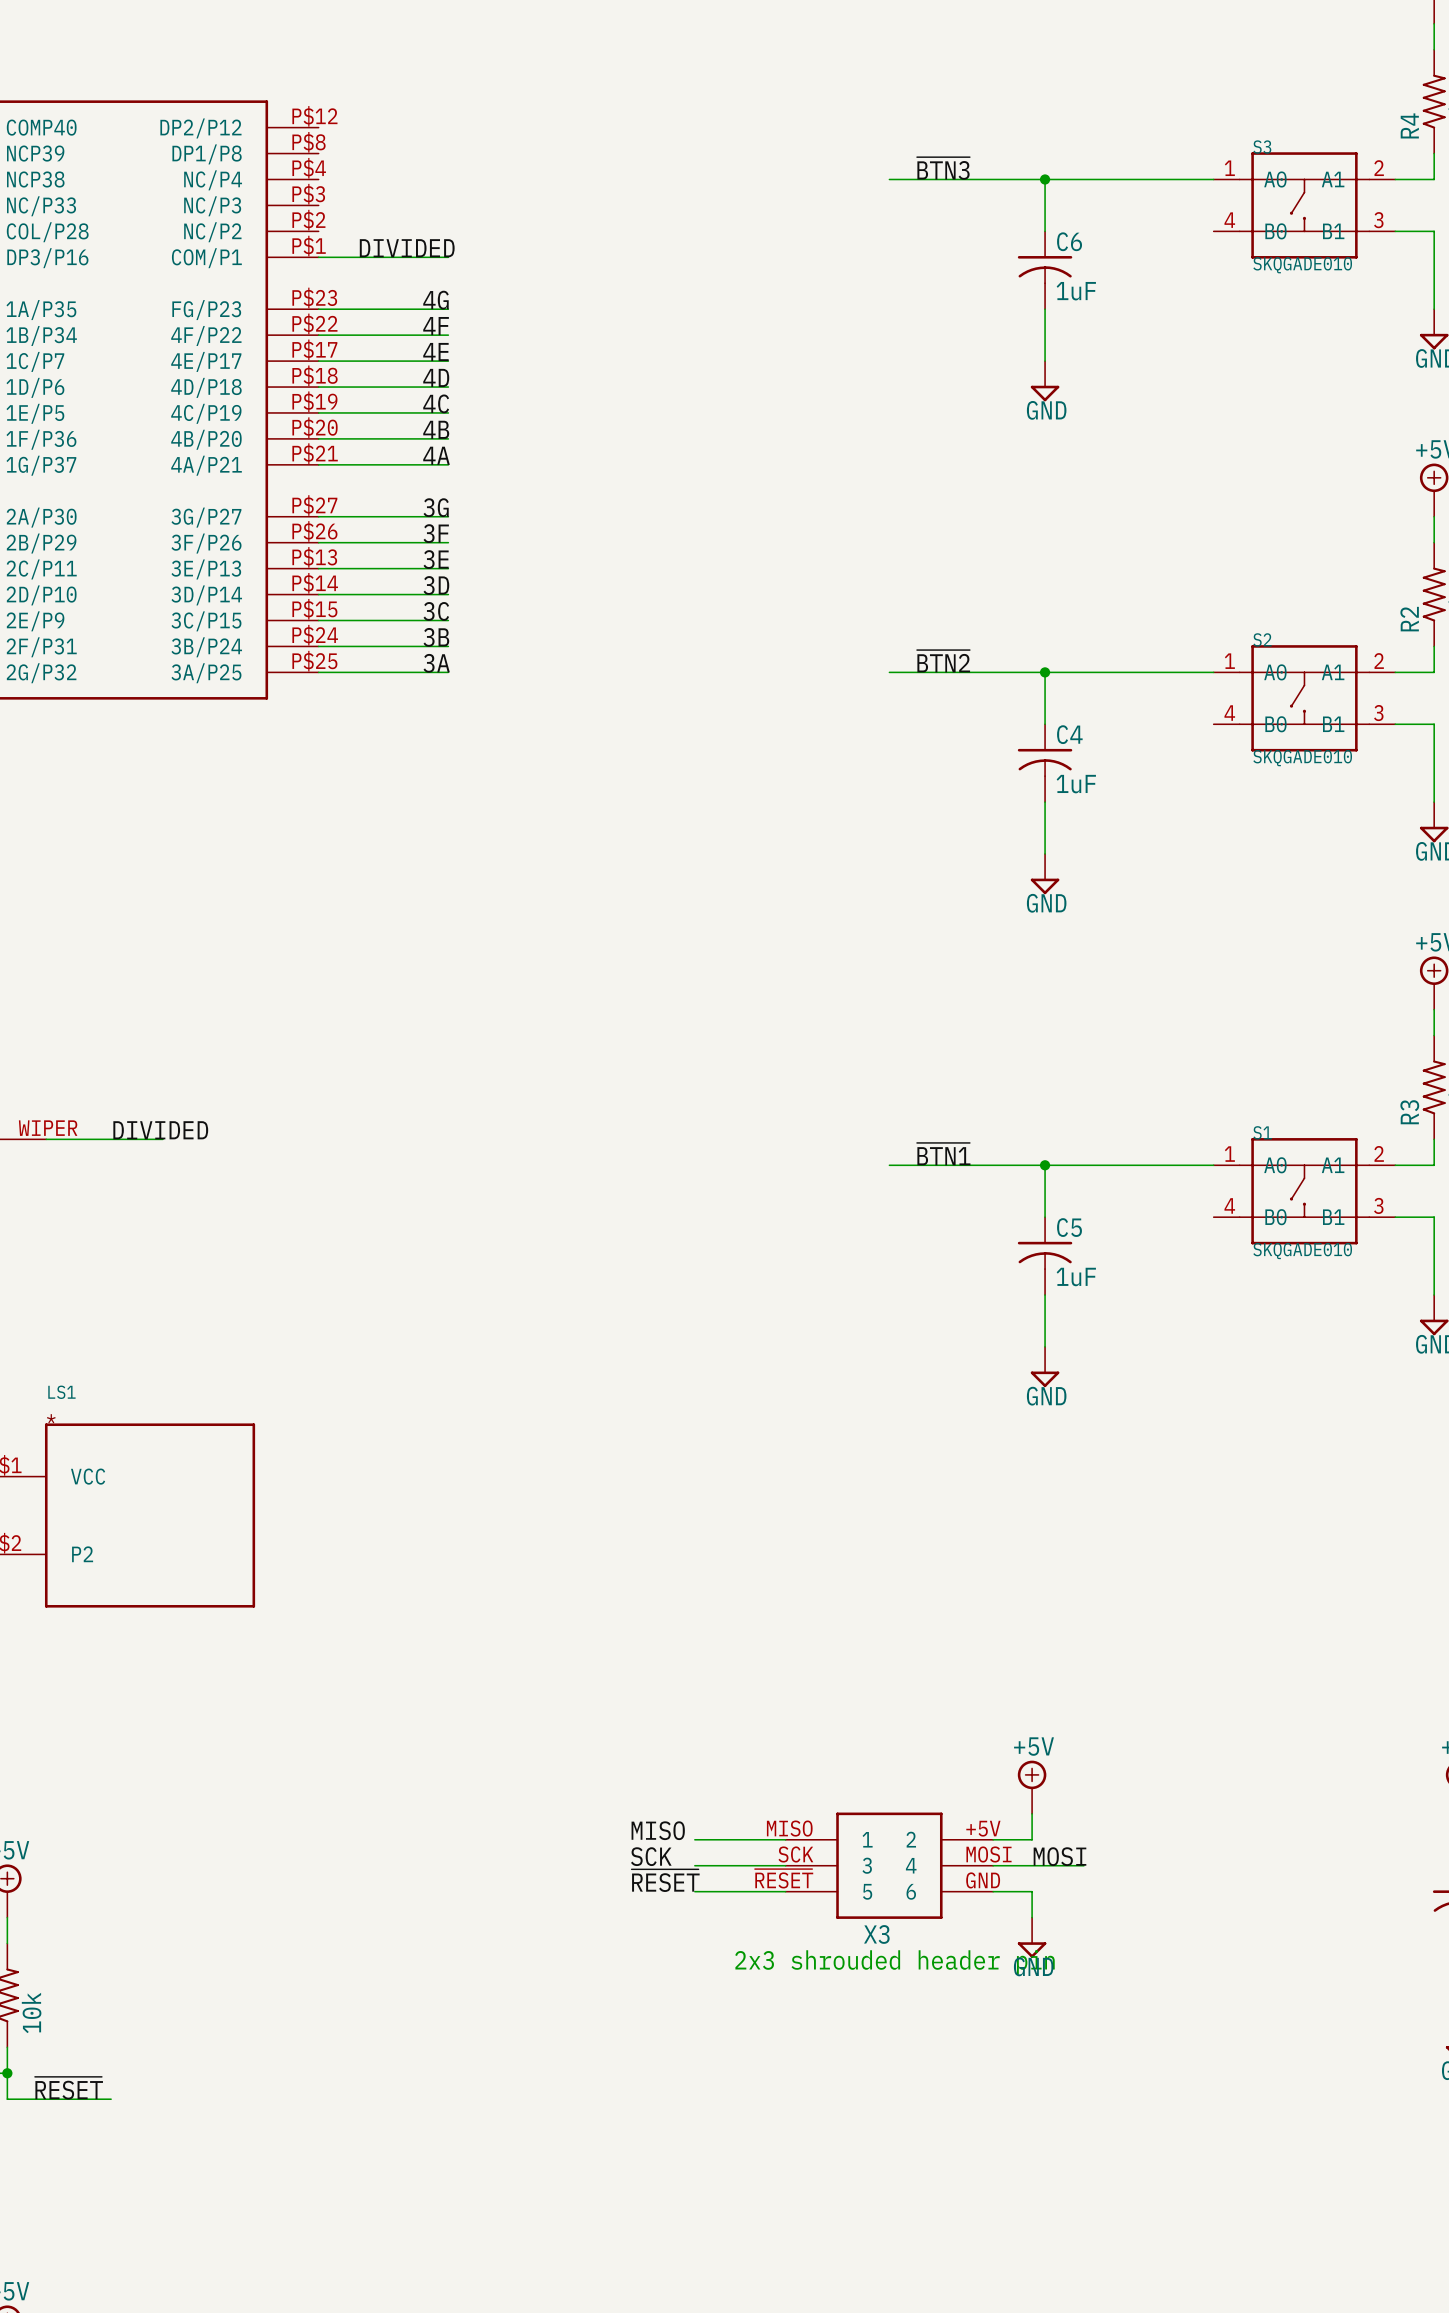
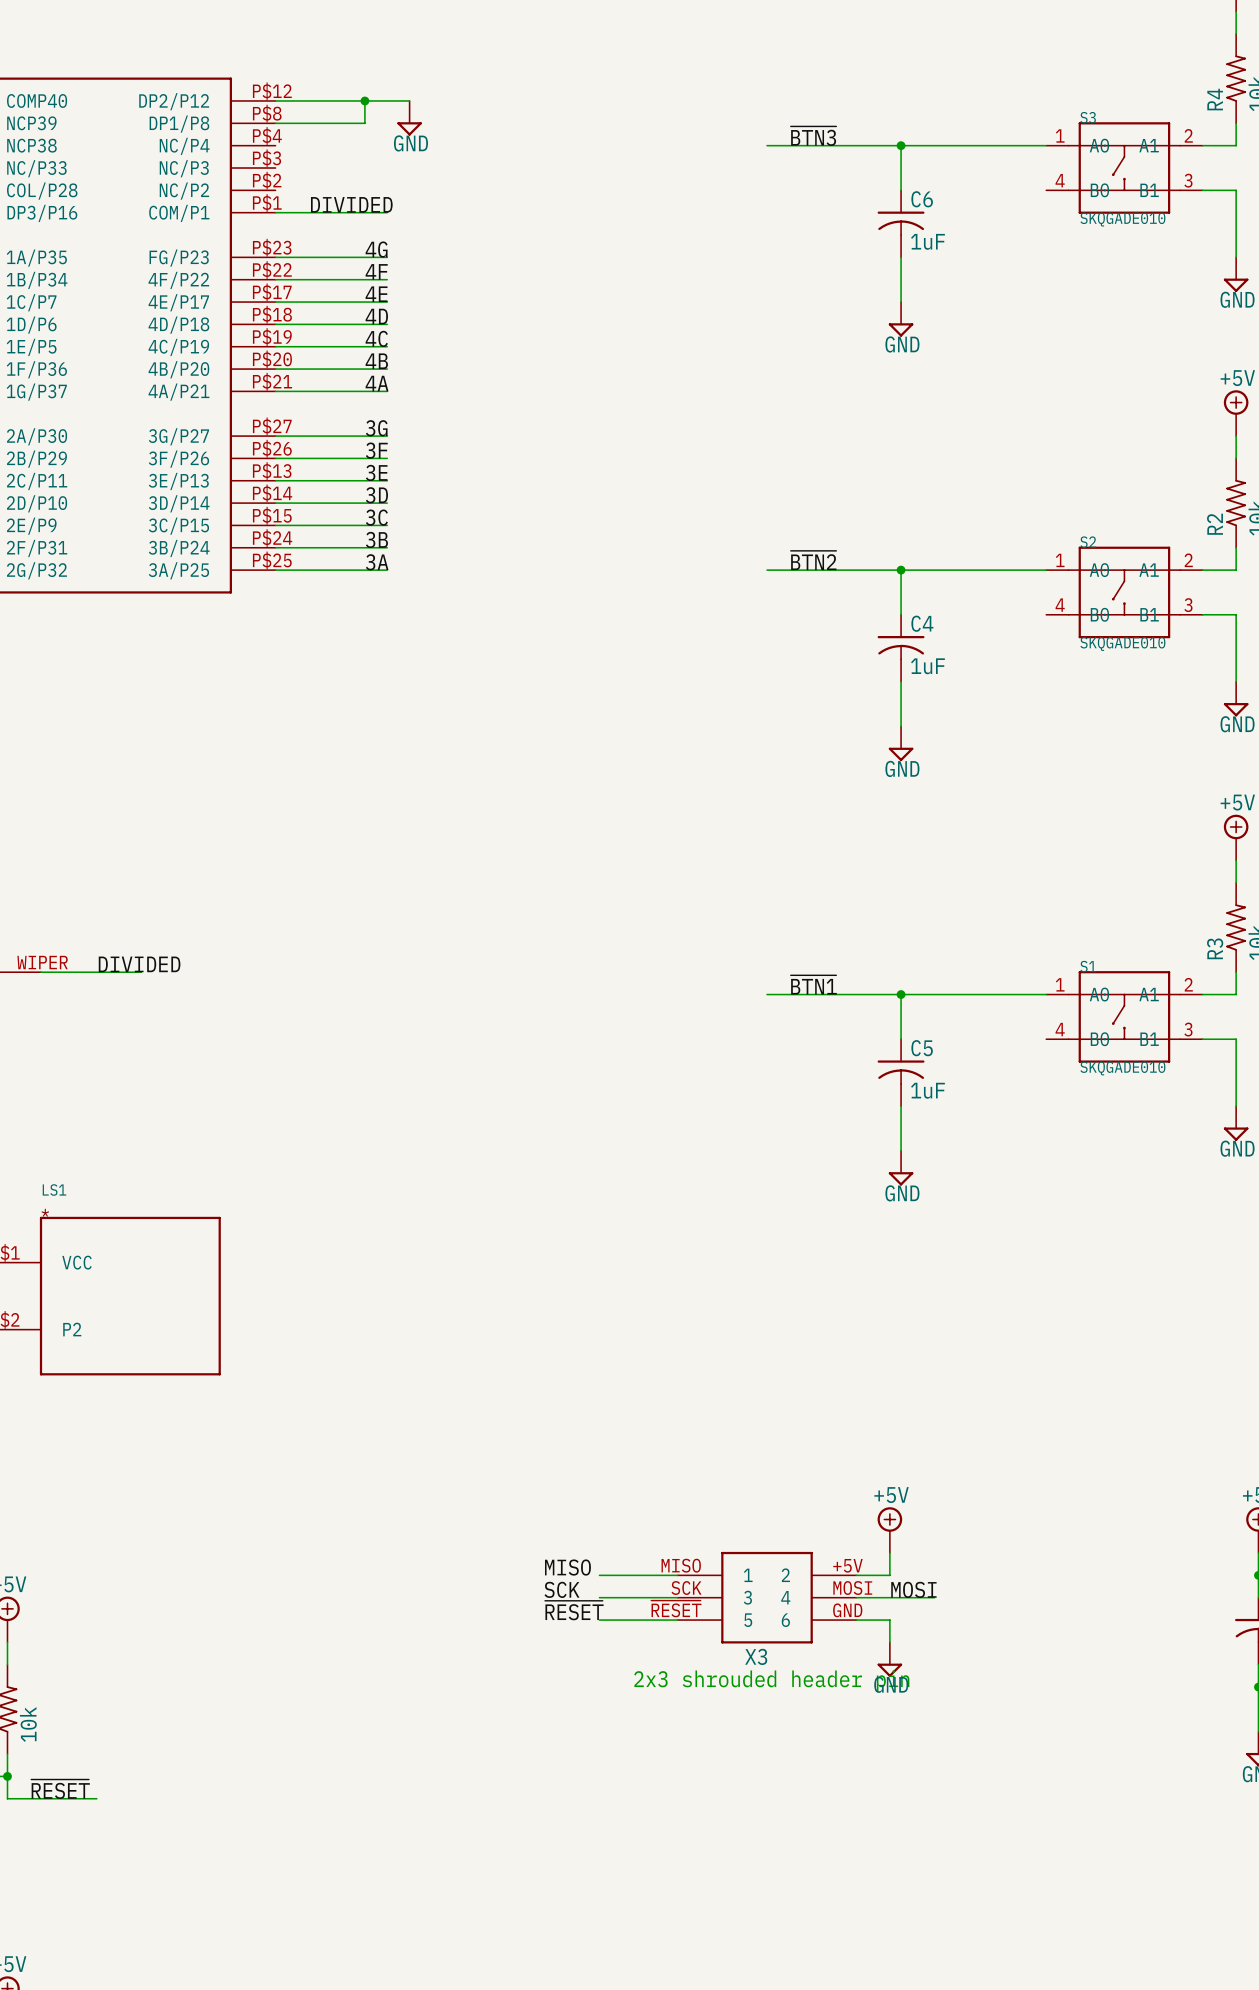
wire: none -> (275, 100) (409, 100)
wire: none -> (364, 100) (364, 123) (275, 123)
junction: none -> (364, 100)
power symbol: none -> GND (409, 118)

